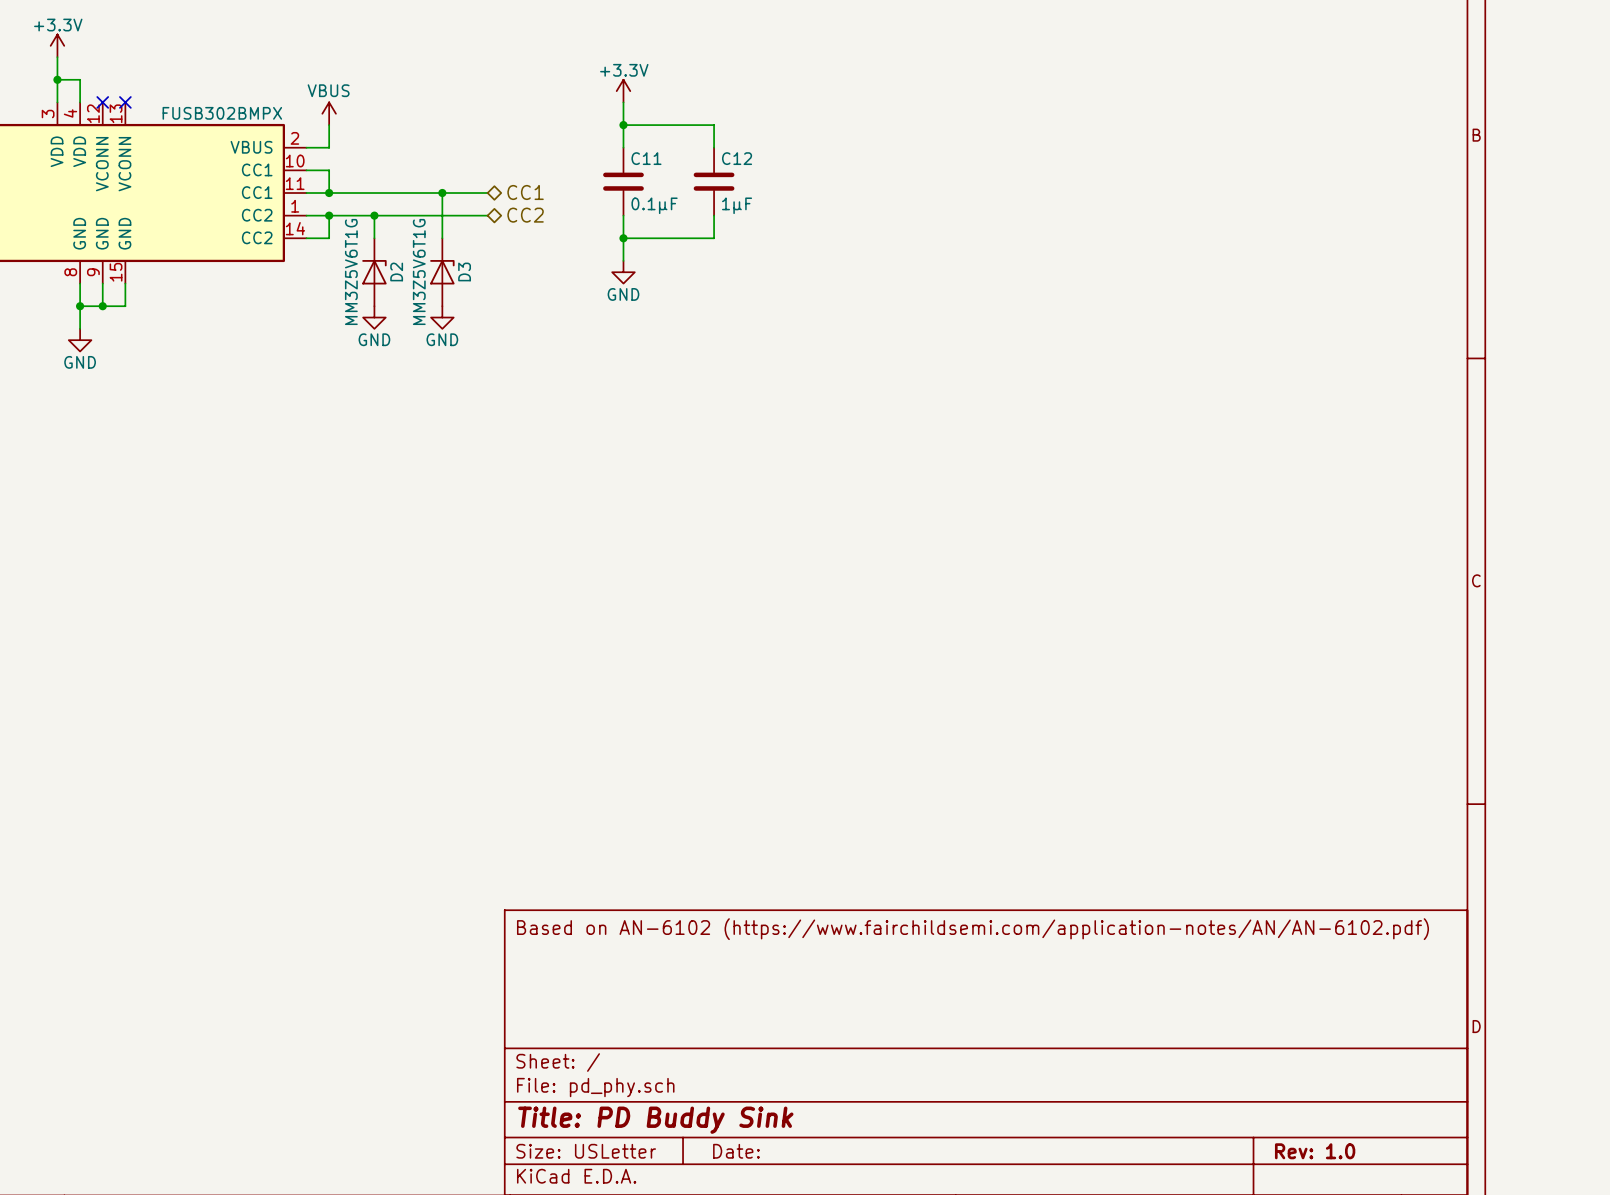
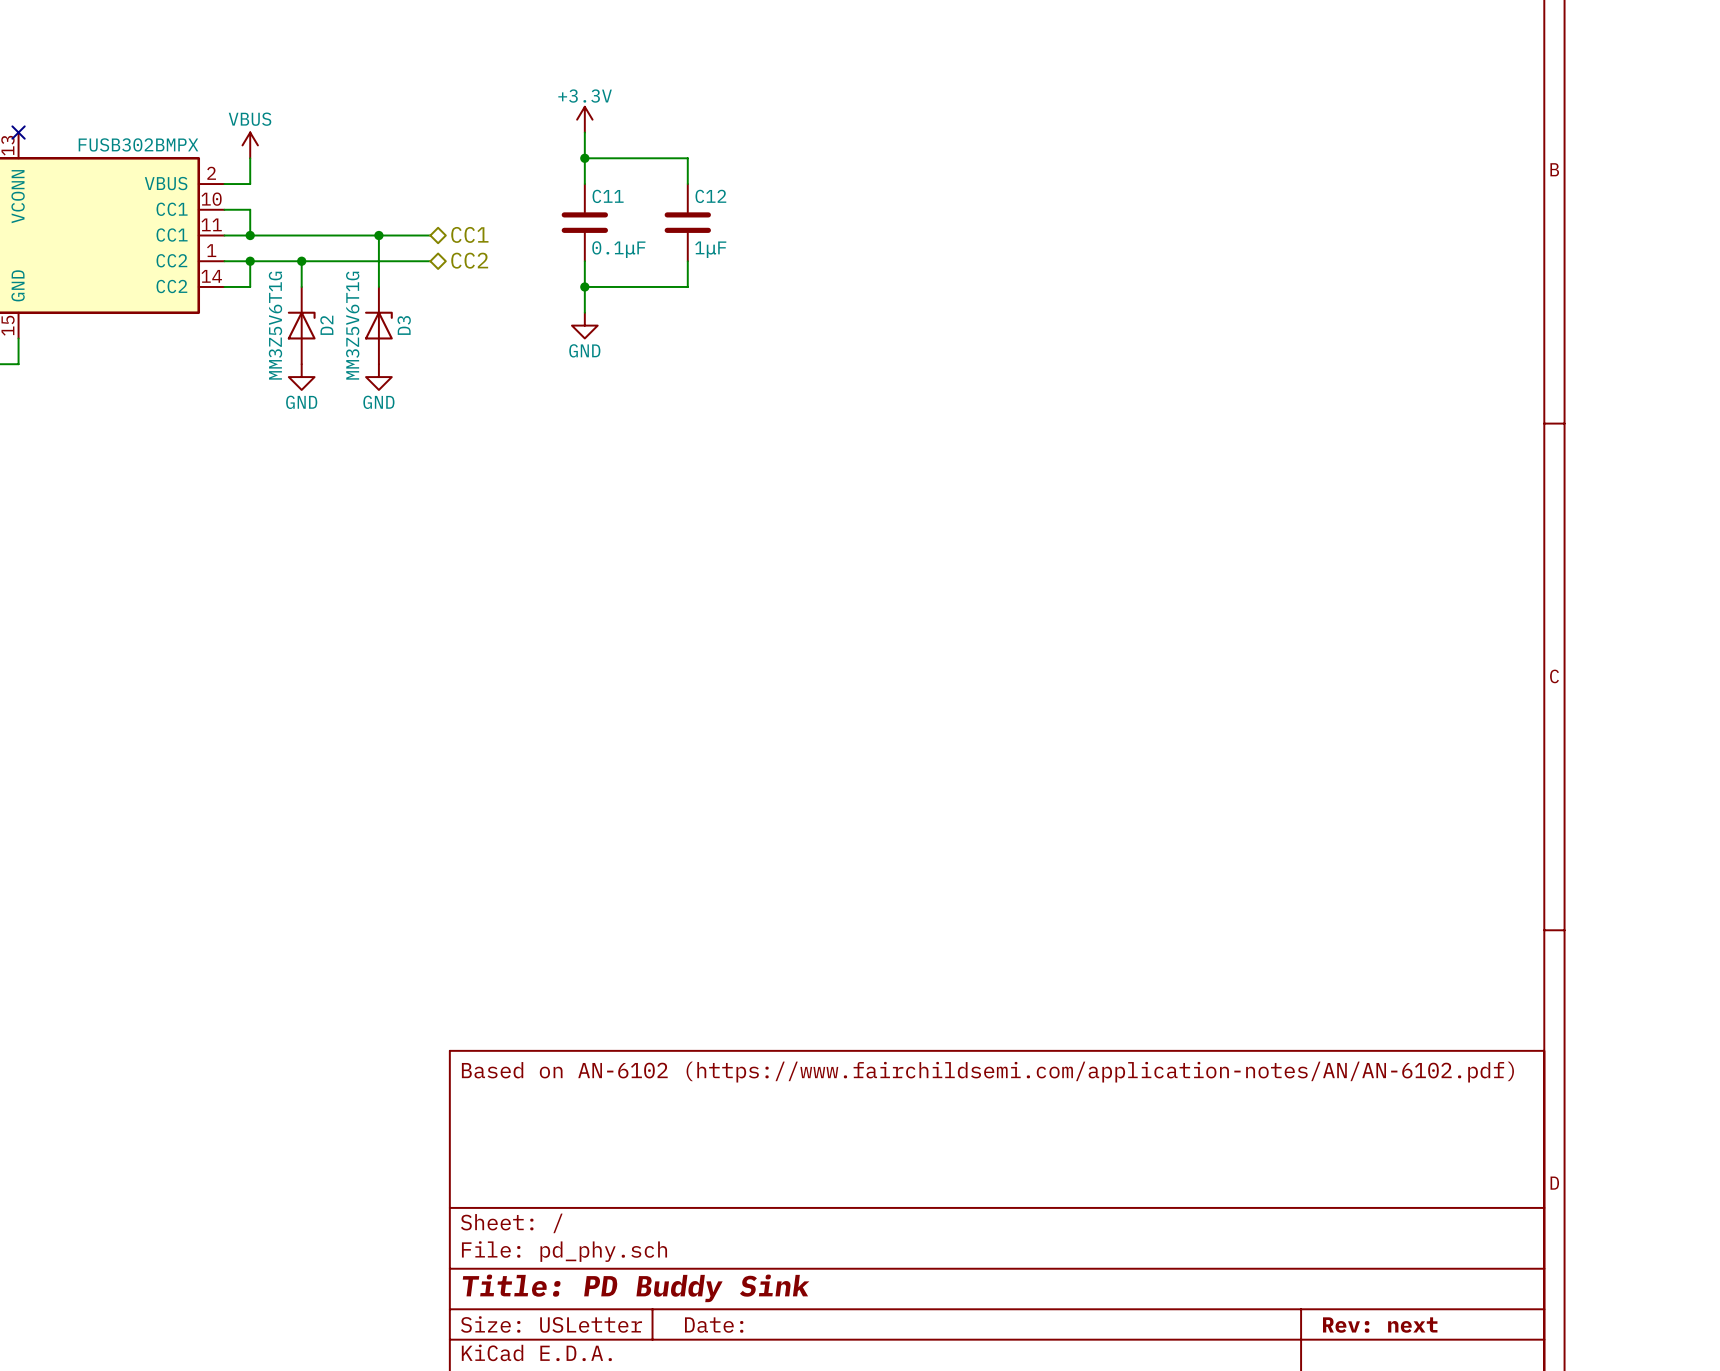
title block: Rev: 1.0 (1315, 1151) -> Rev: next (1380, 1325)

